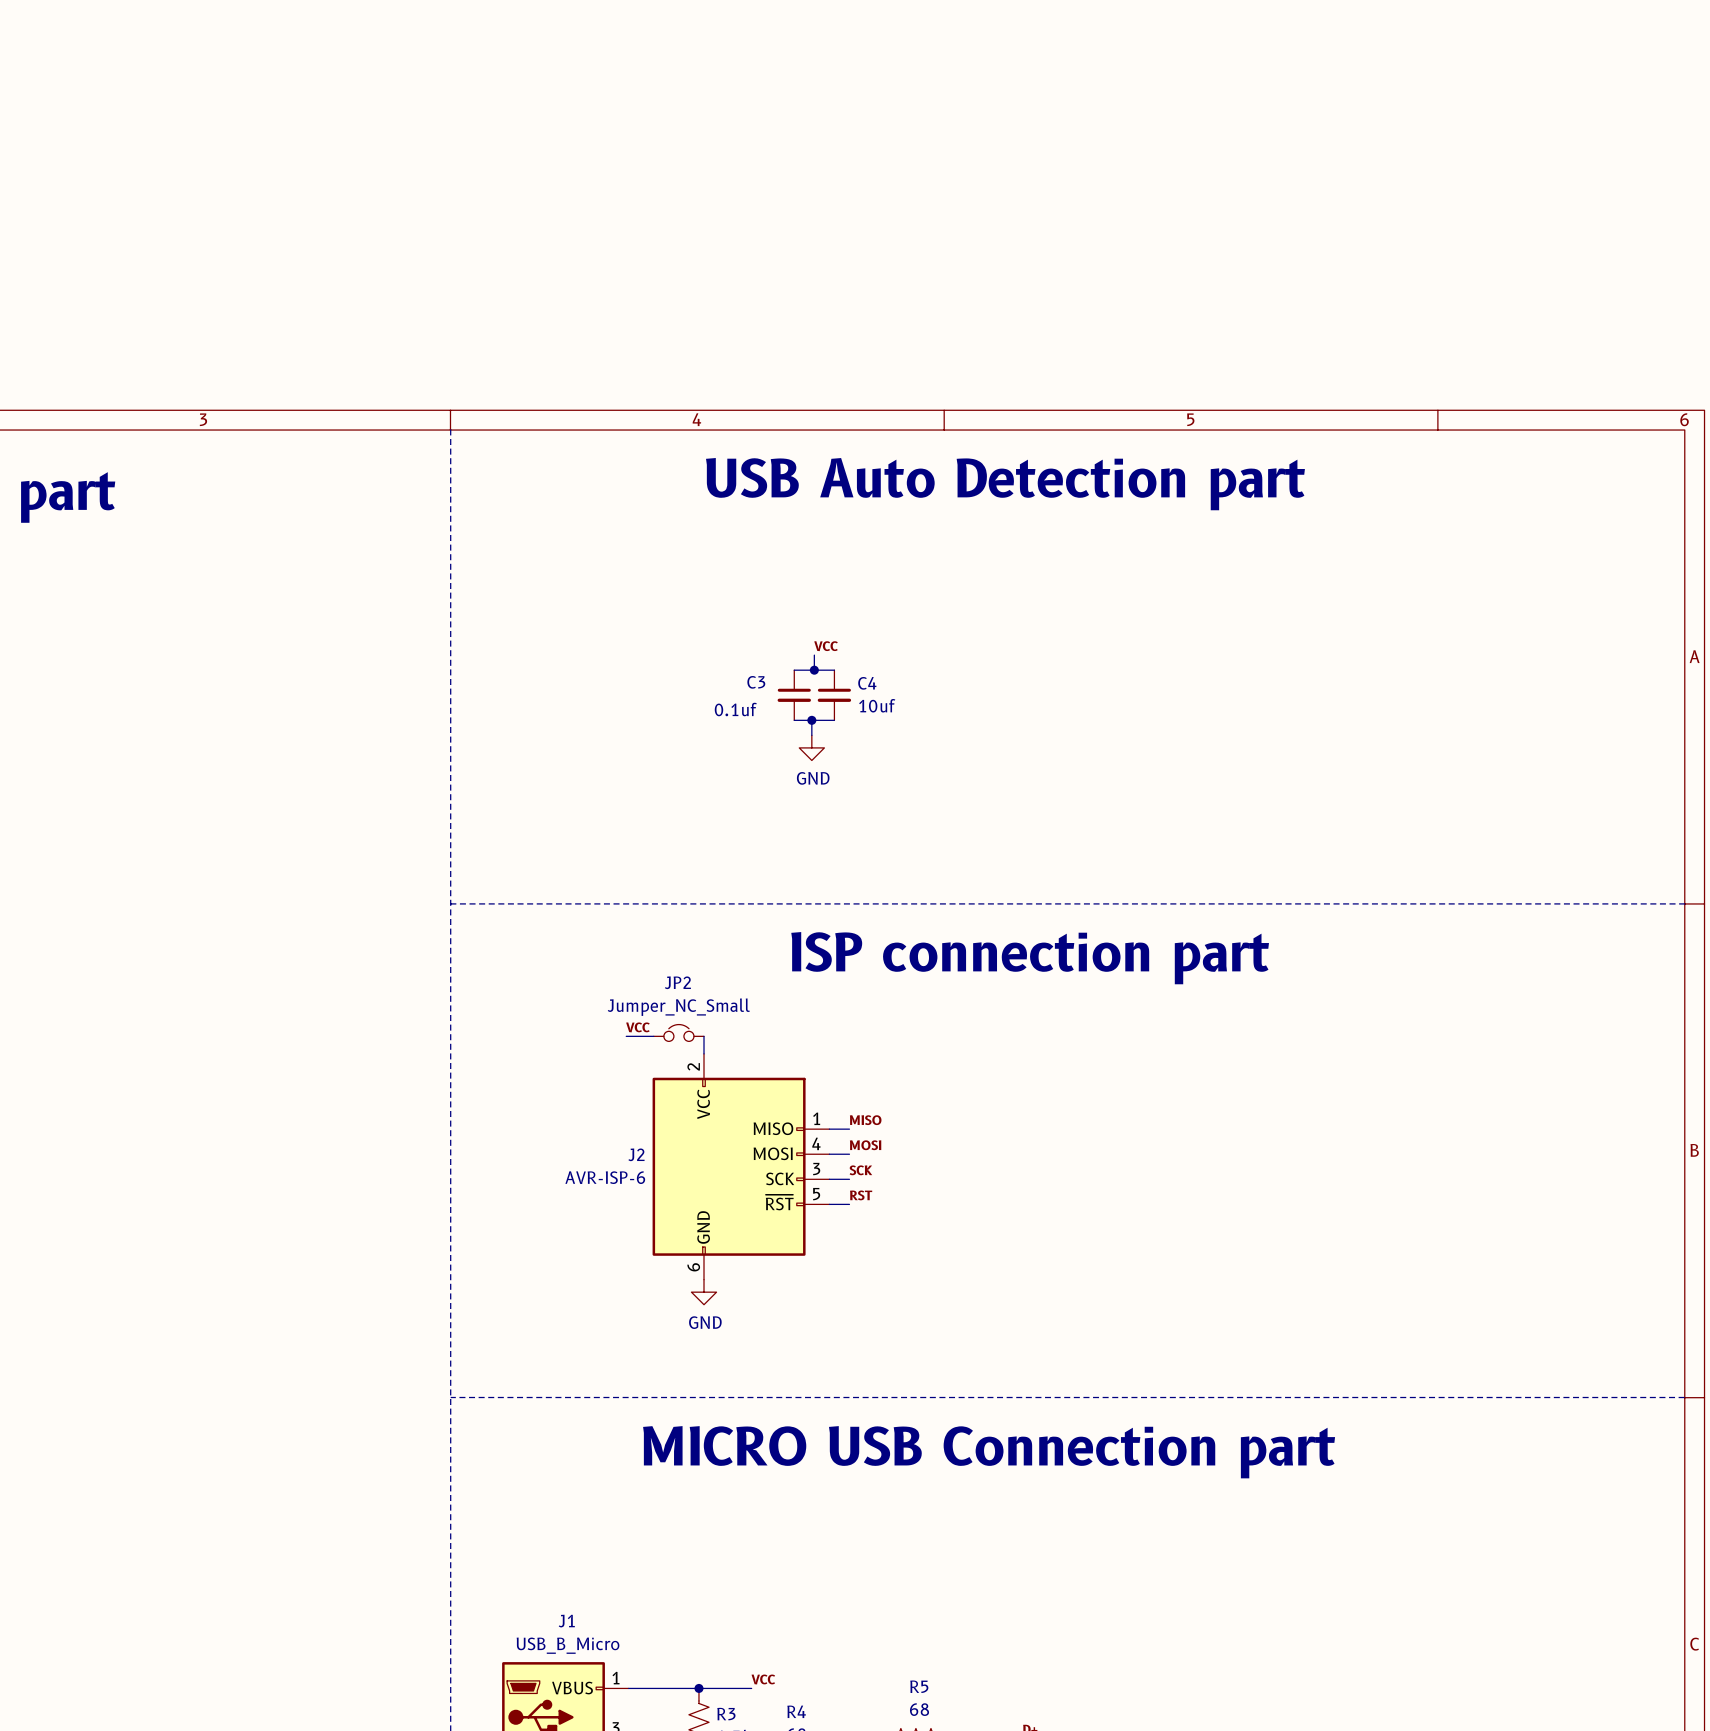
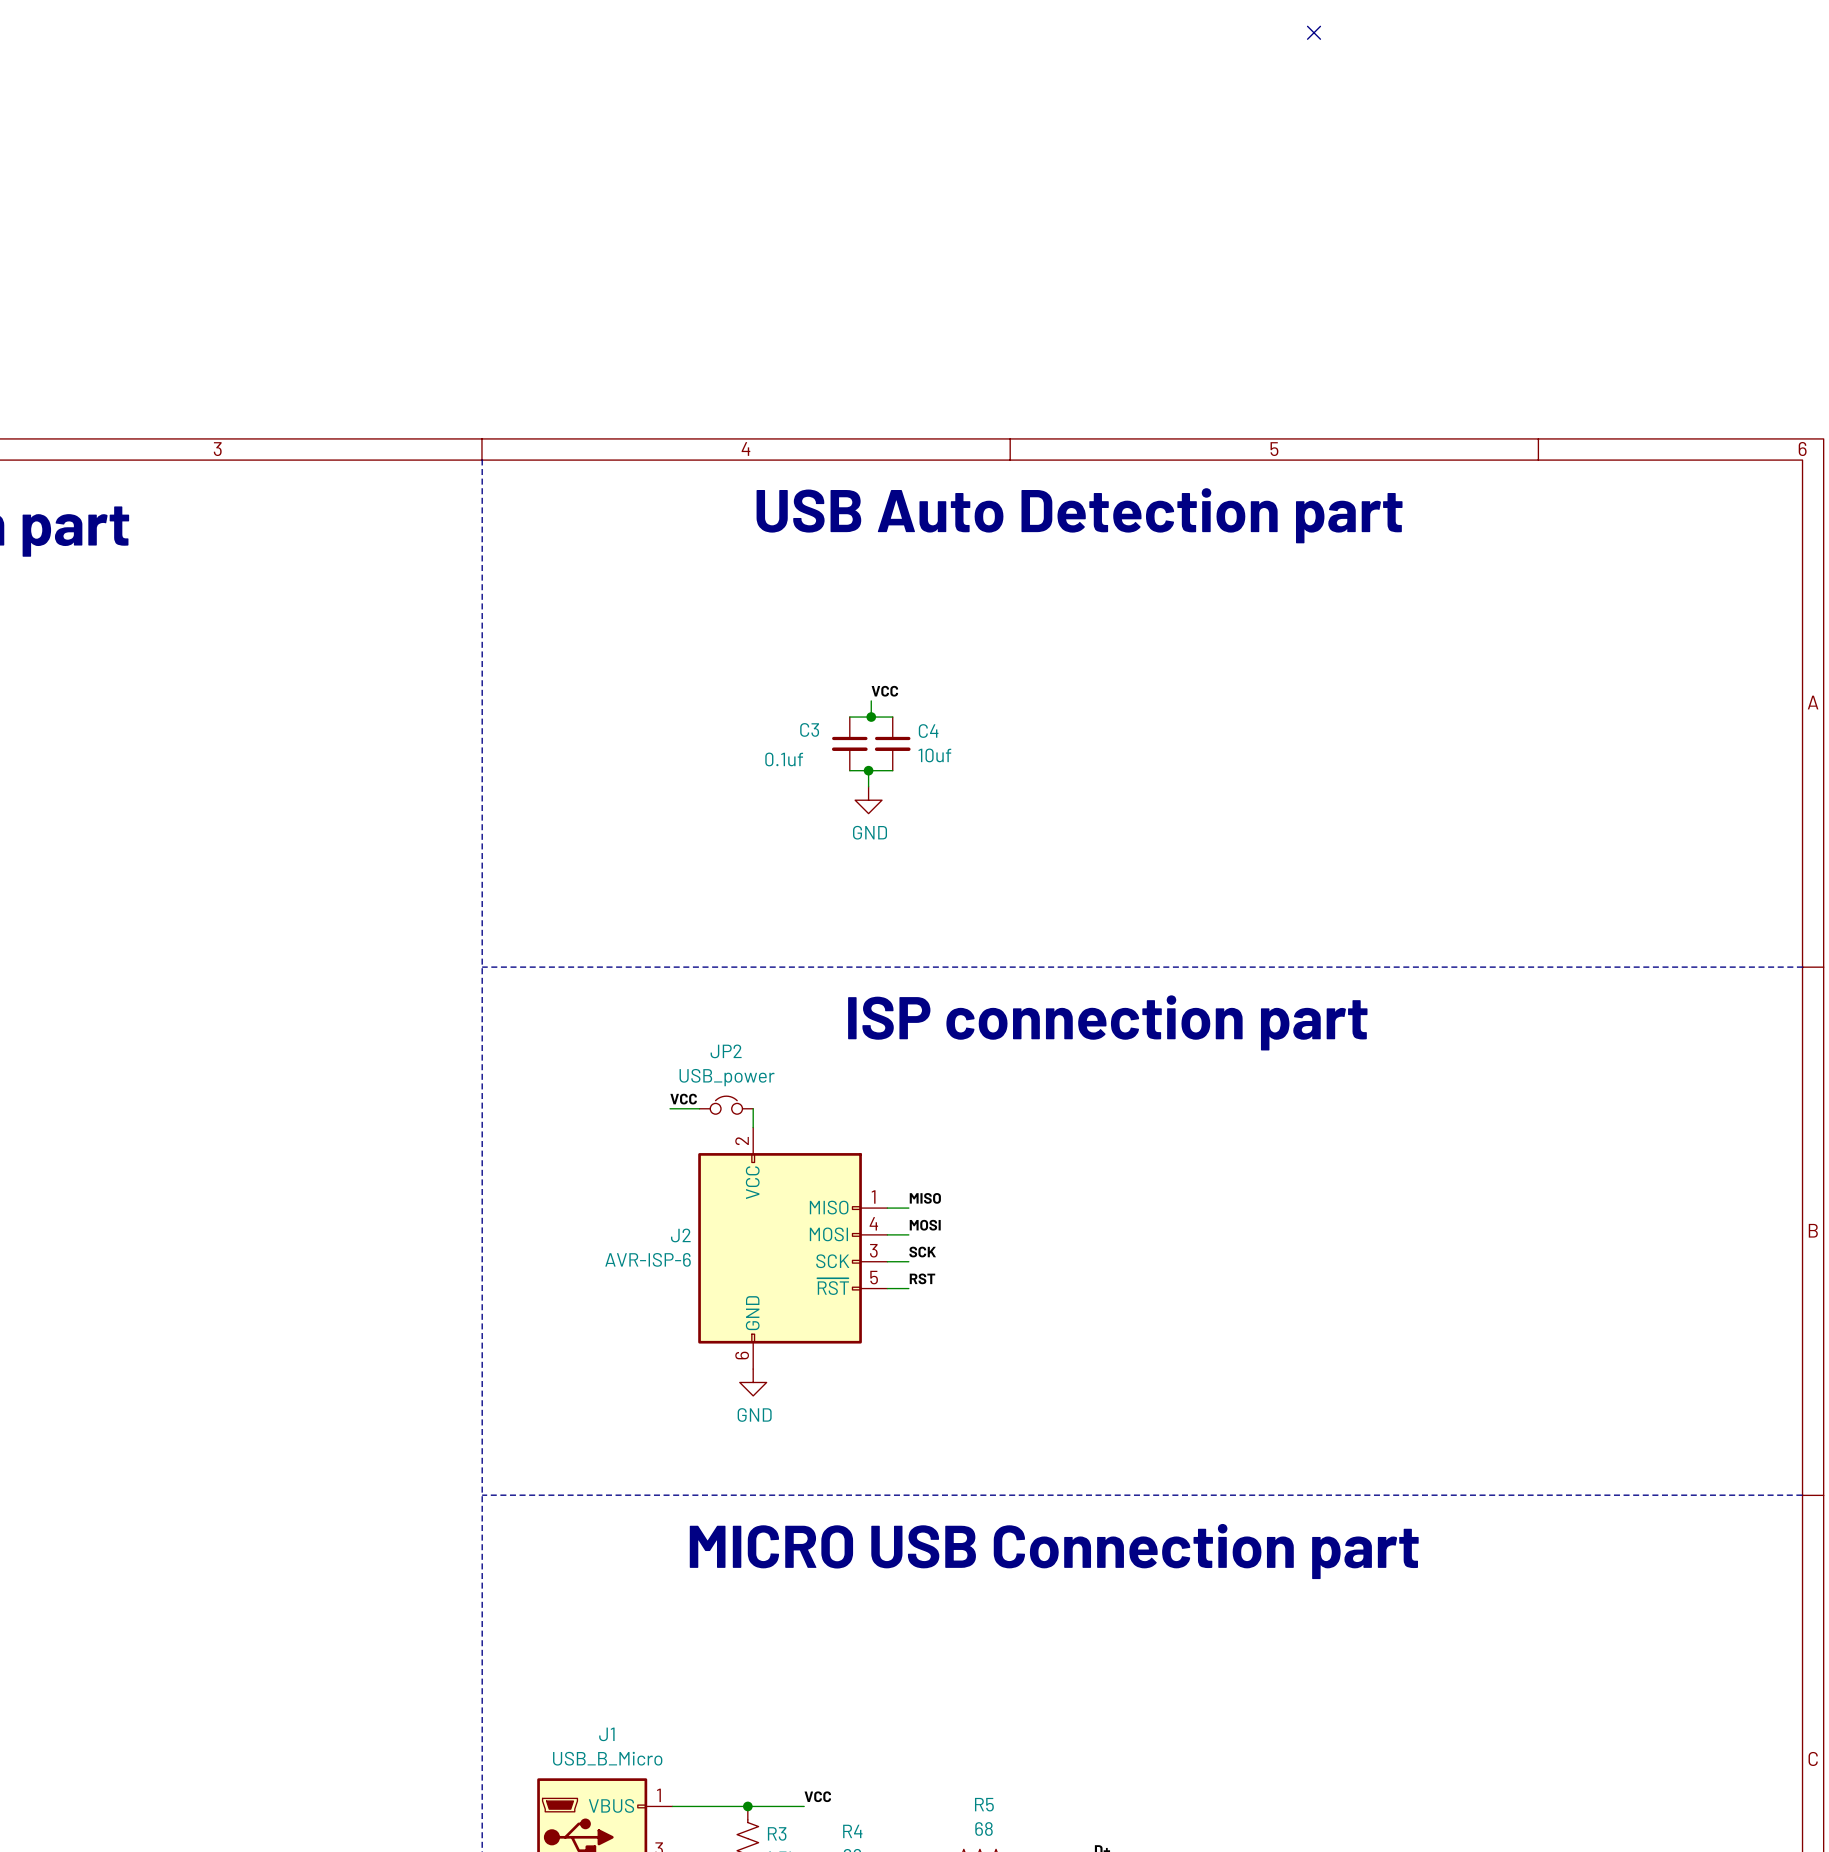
no-connect mark: none -> (1314, 32)
JP2 value: Jumper_NC_Small (678, 1007) -> USB_power (727, 1077)

